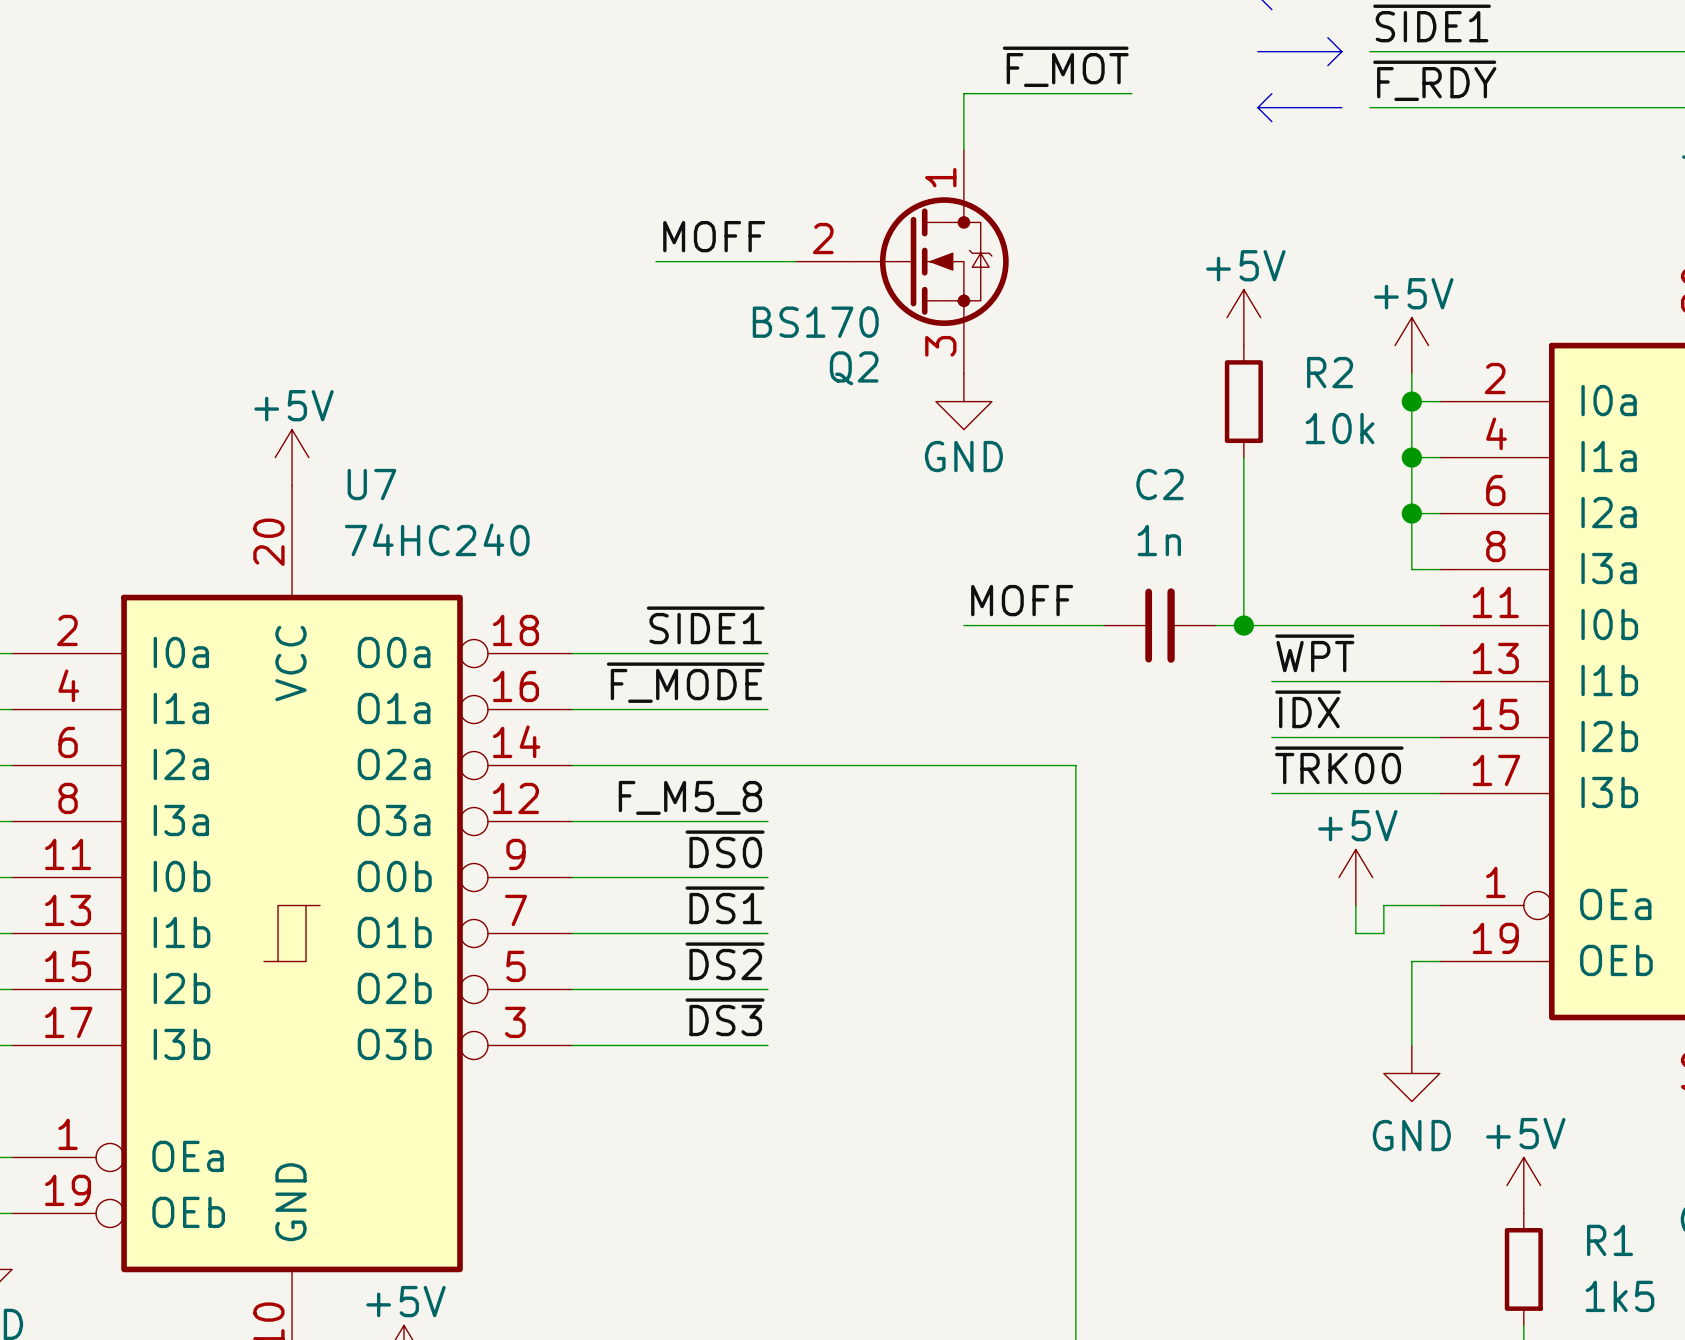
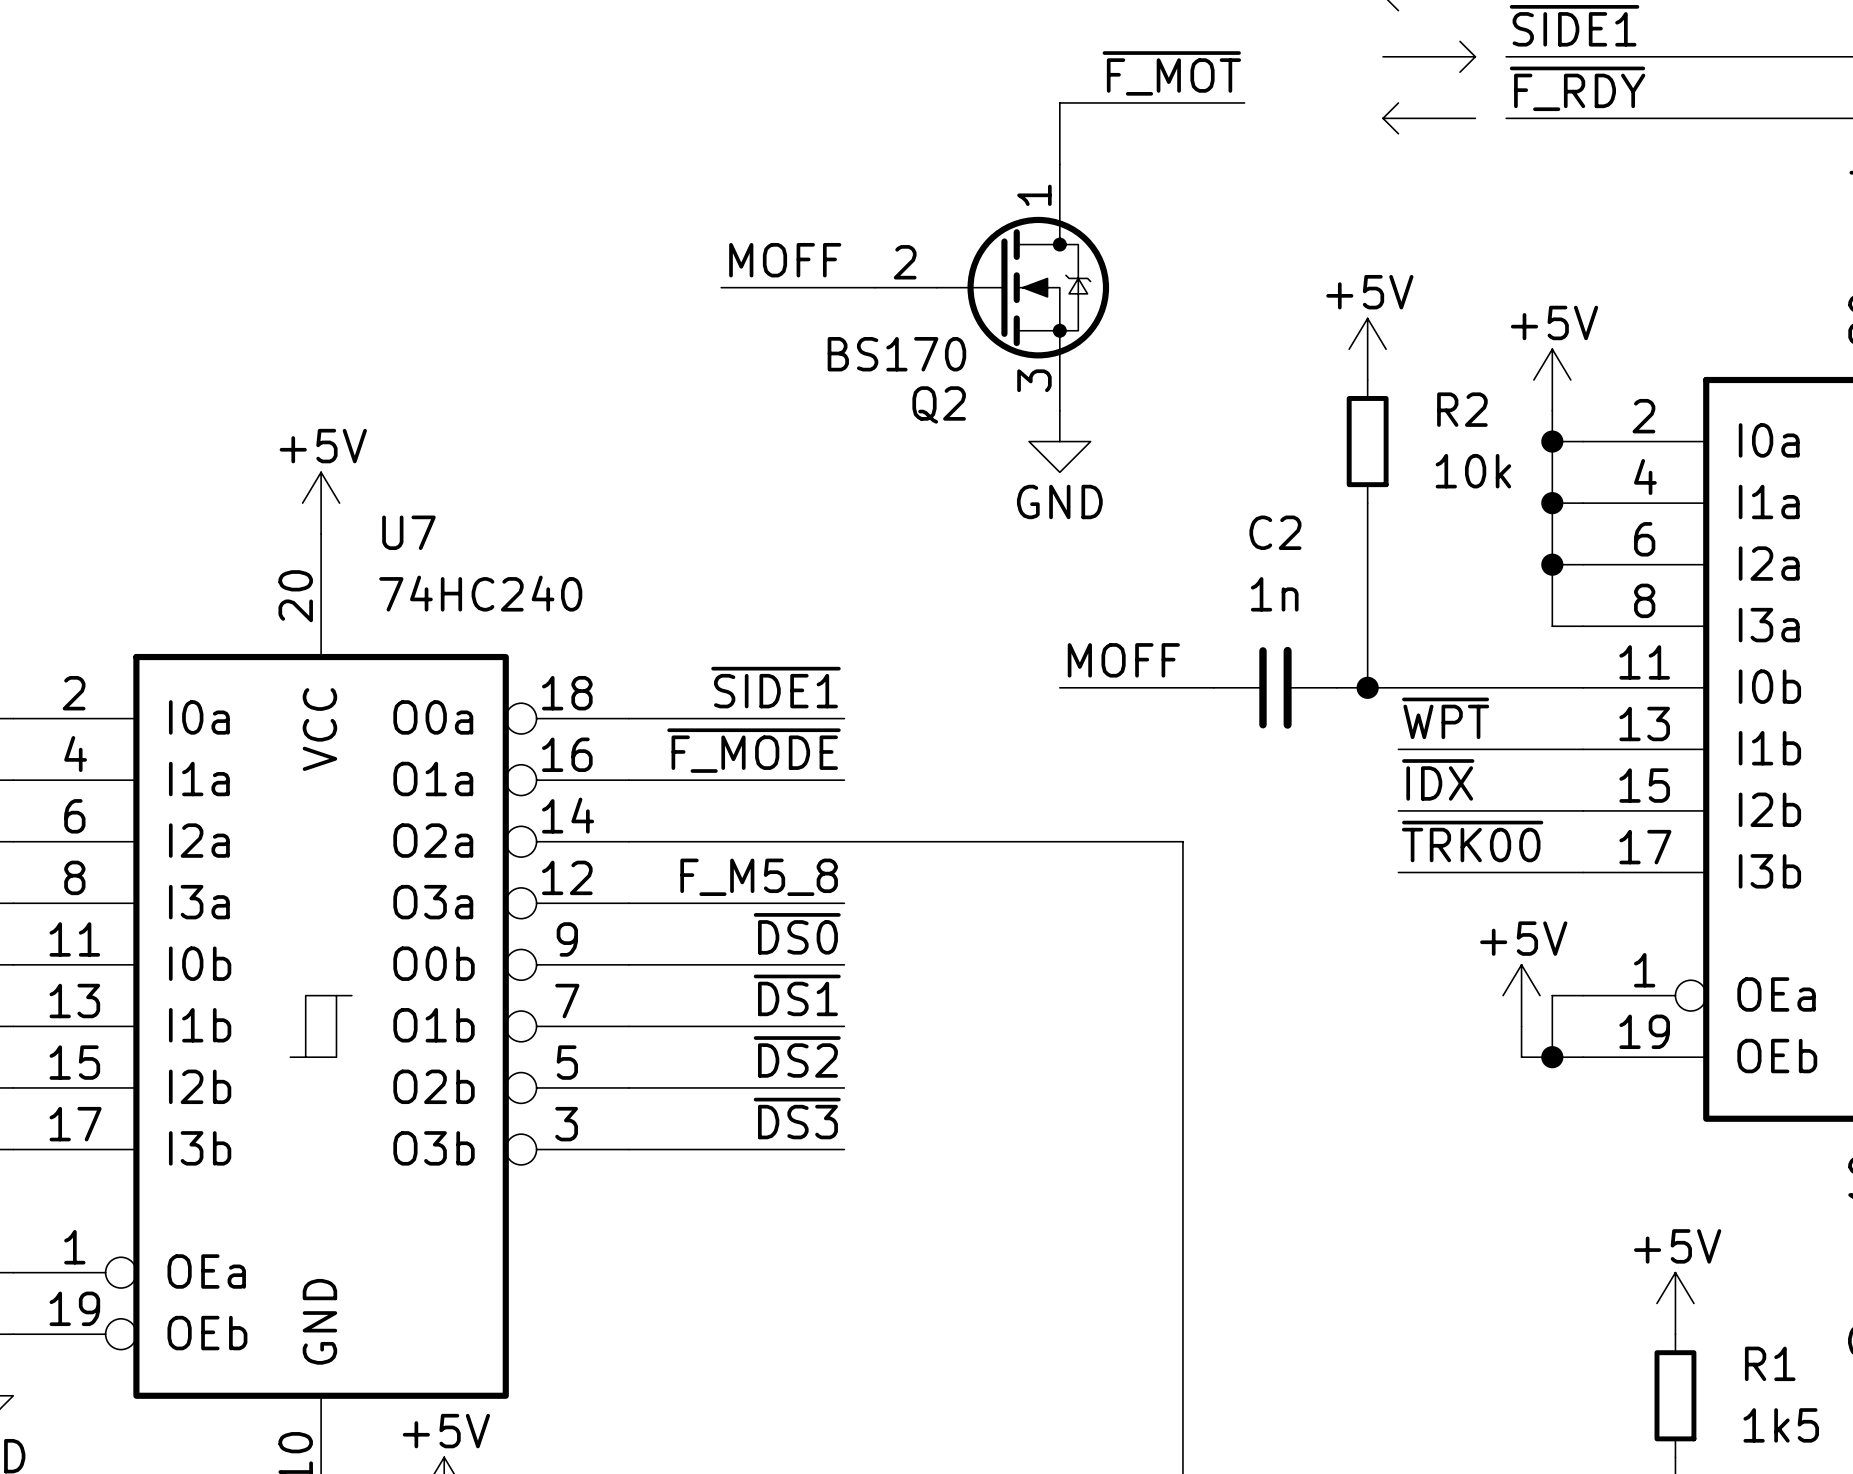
power symbol position: +5V (1355, 877) -> +5V (1521, 995)
wire: (1355, 905) (1355, 933) (1383, 933) (1383, 905) (1411, 905) -> (1521, 1026) (1521, 1057) (1552, 1057) (1552, 995)
wire: (1411, 961) (1411, 1045) -> none
junction: none -> (1552, 1057)
power symbol: GND (1411, 1073) -> none

